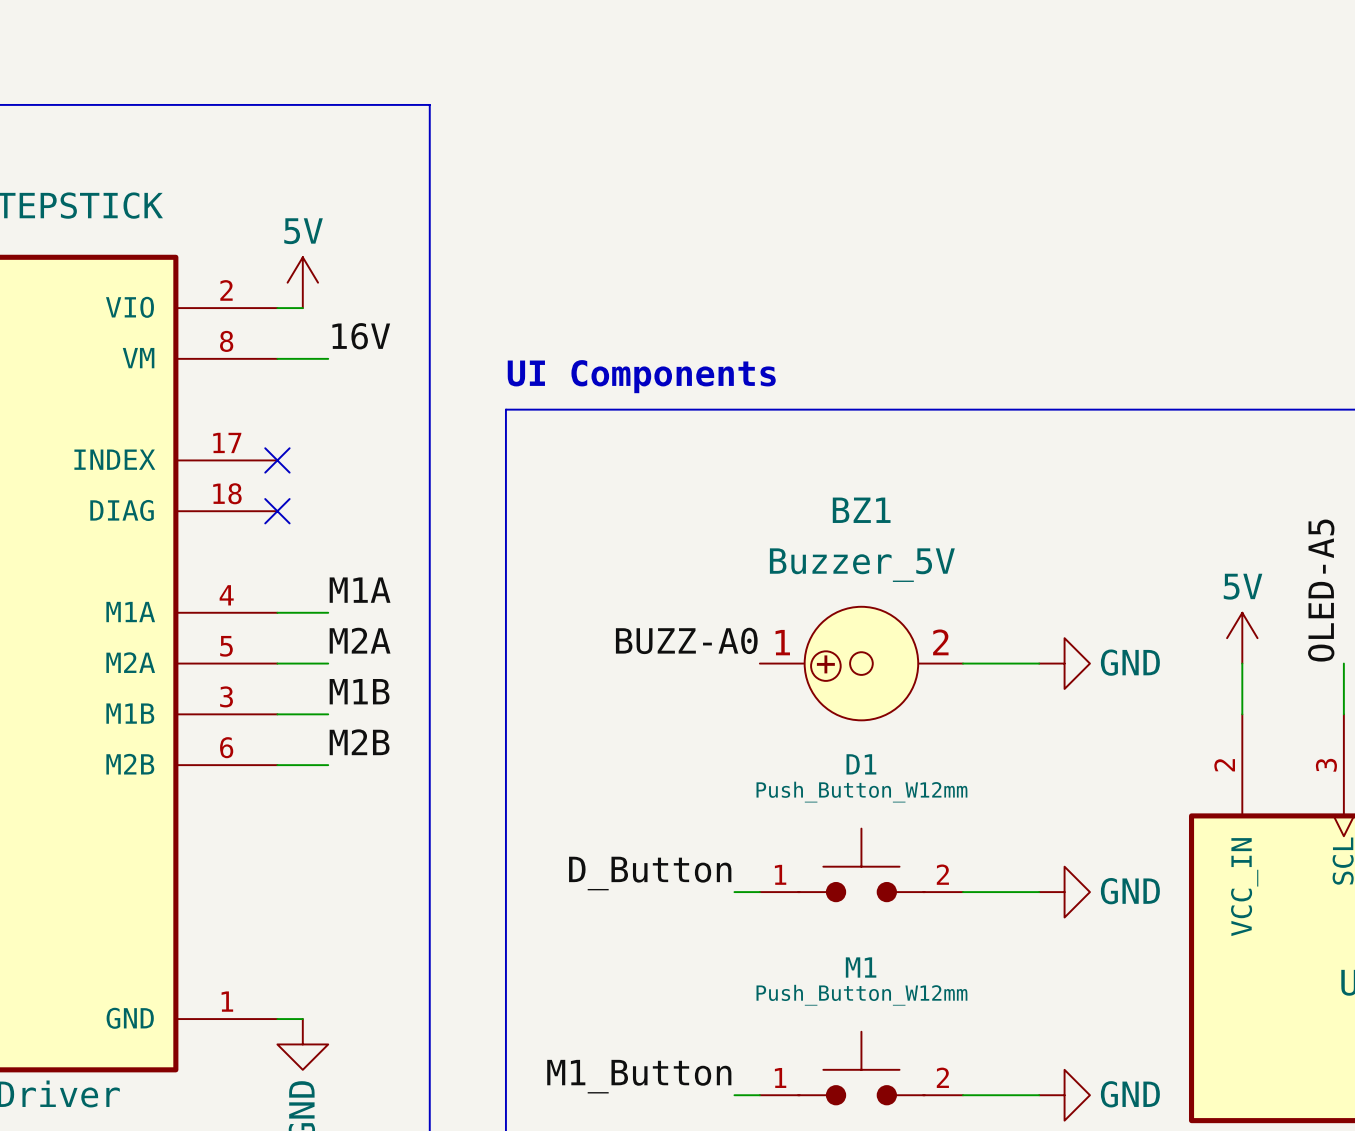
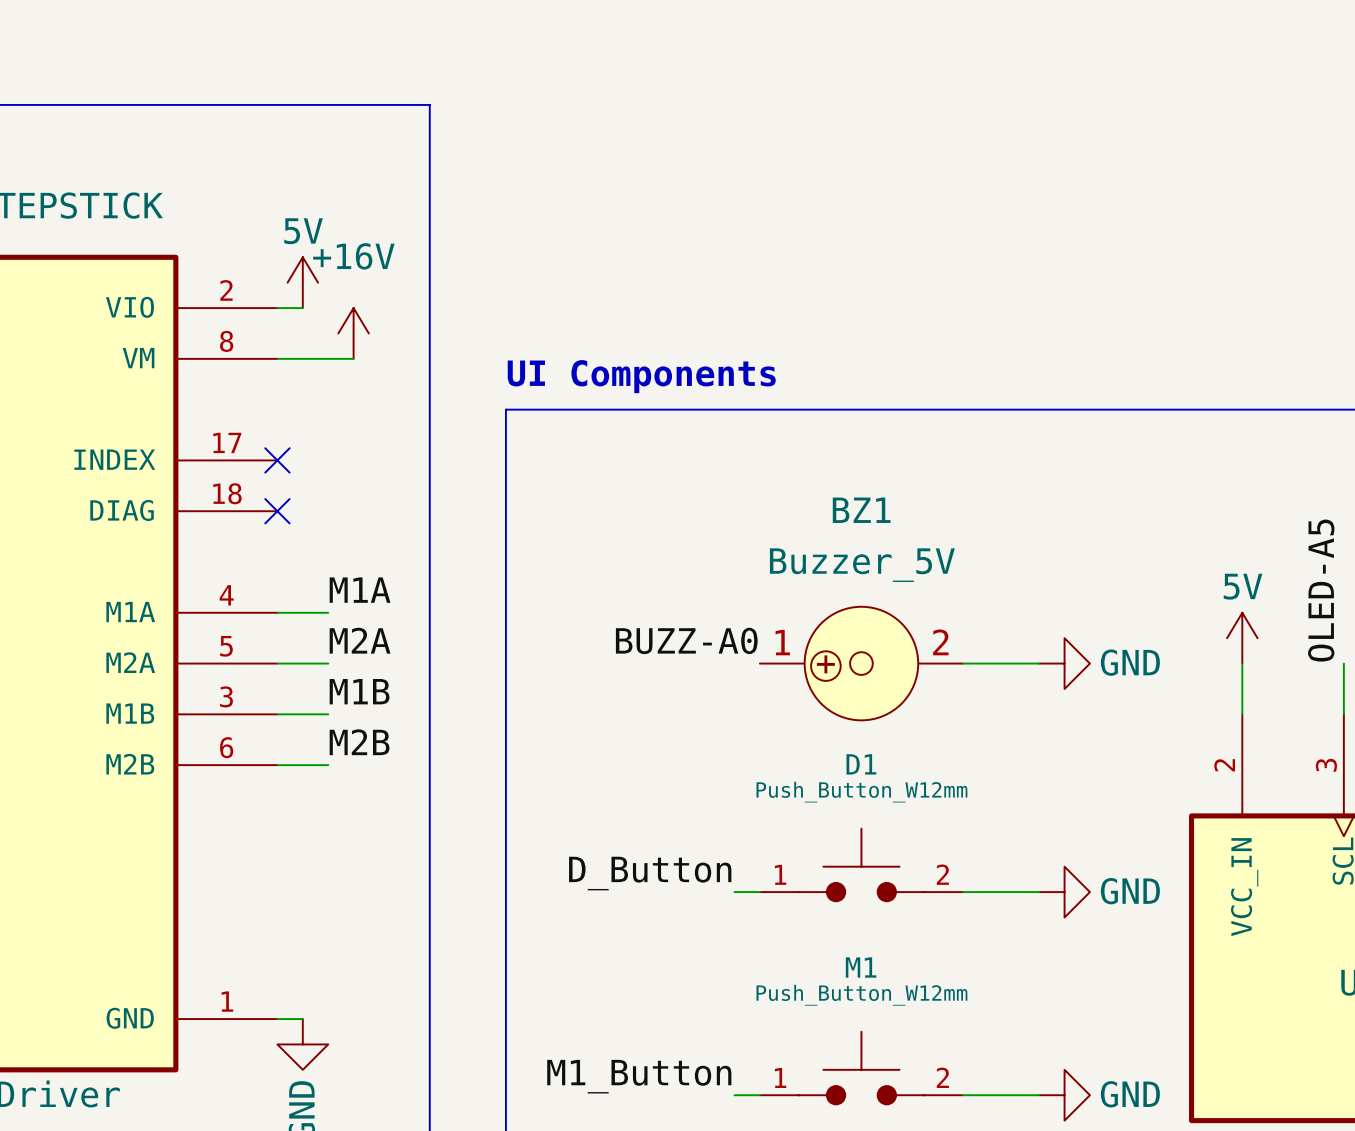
power symbol: none -> +16V (353, 333)
label: 16V (361, 336) -> none
wire: none -> (328, 358) (353, 358)

